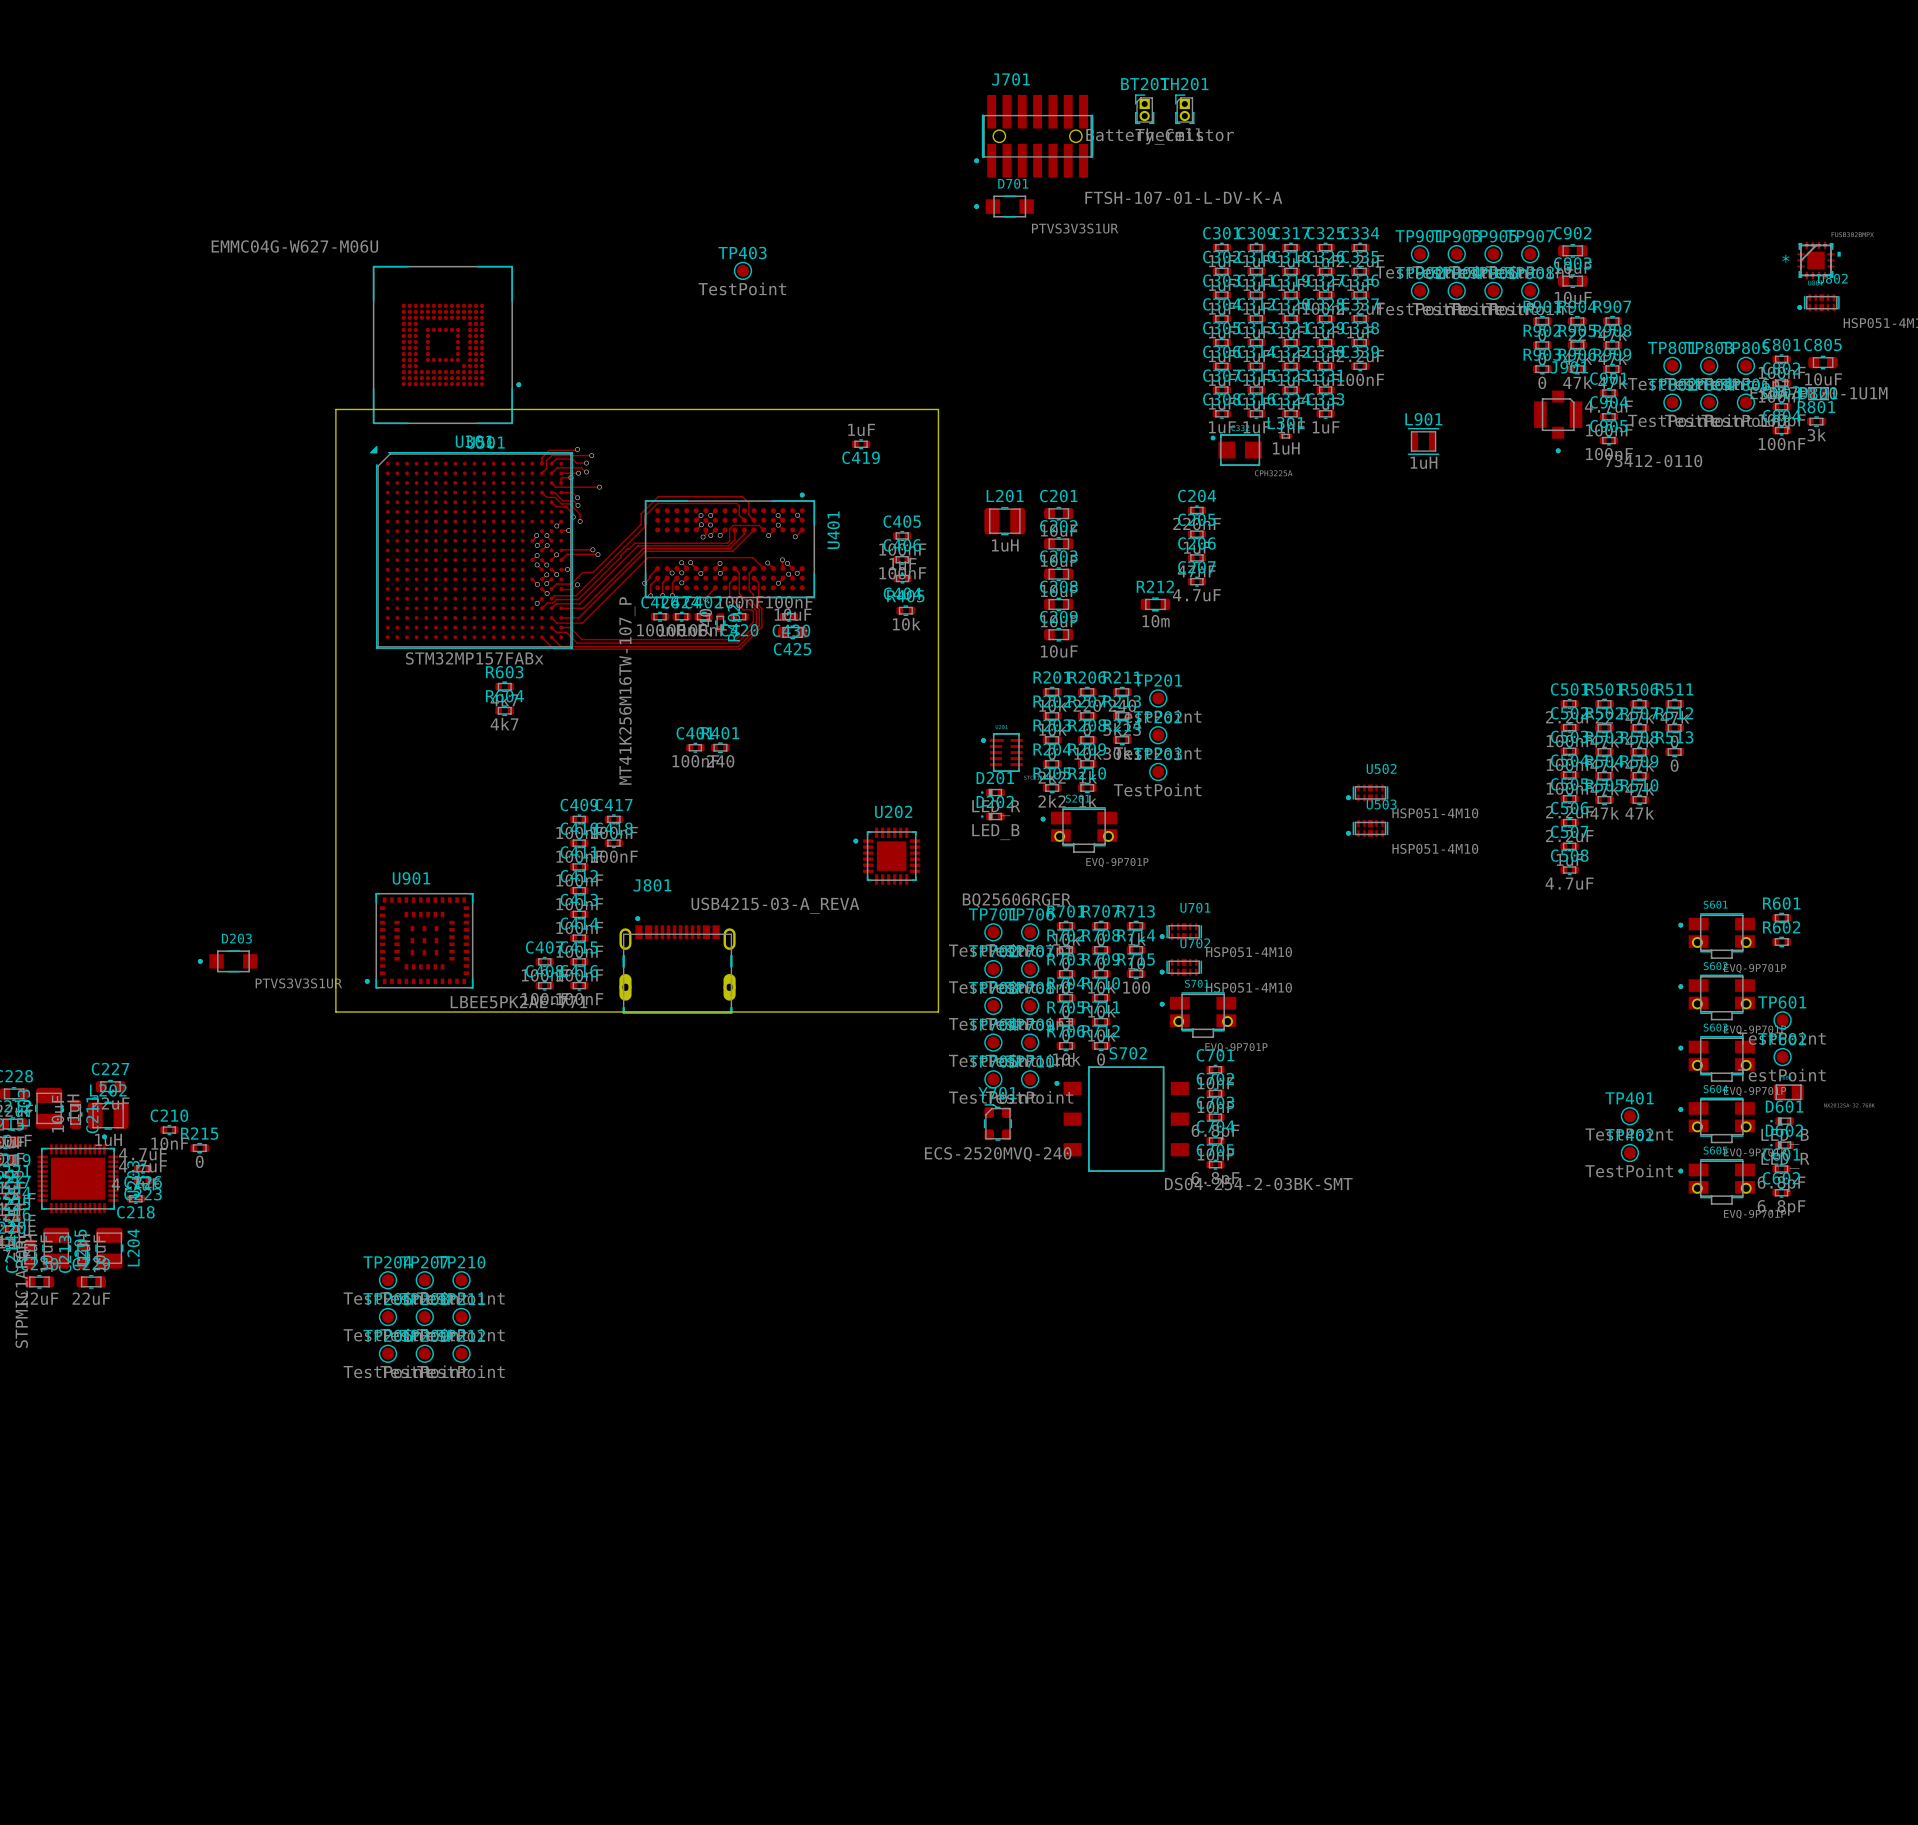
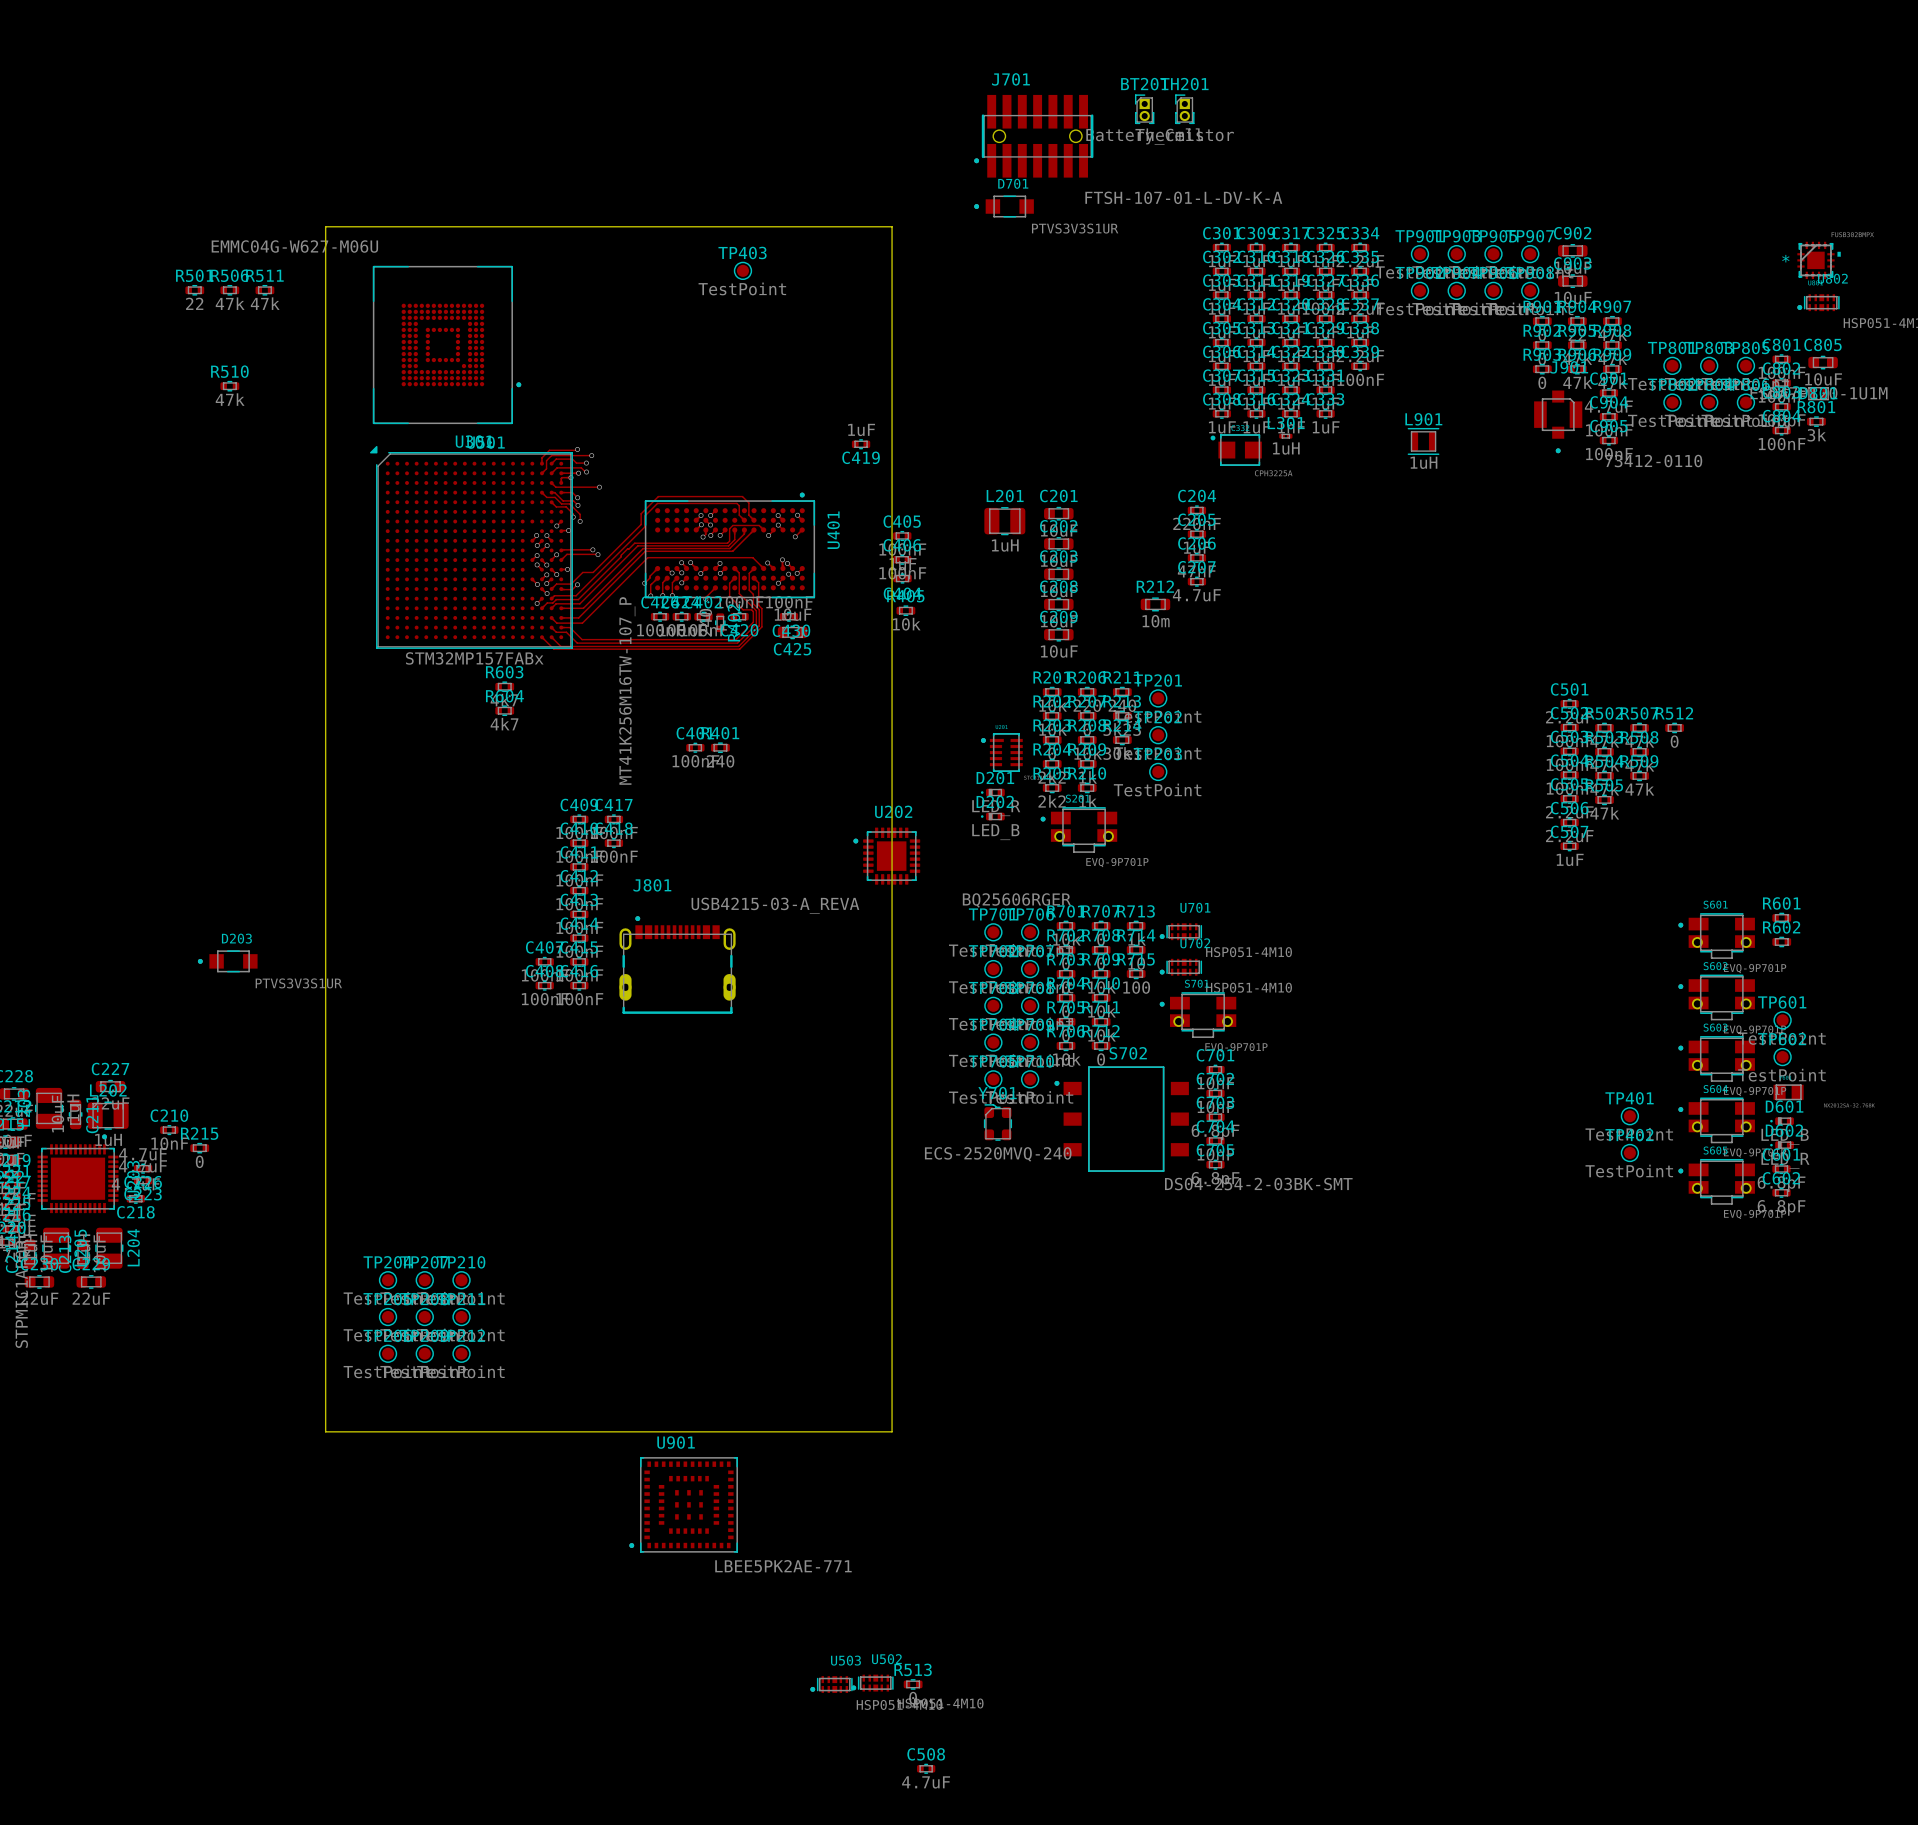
board edge: none -> (325, 226) (892, 226) (892, 1431) (325, 1431) (325, 226)
board edge: (335, 409) (938, 409) (938, 1011) (335, 1011) (335, 409) -> none
R501 position: (1604, 703) -> (194, 290)
R506 position: (1639, 703) -> (229, 290)
R511 position: (1674, 703) -> (264, 290)
R513 position: (1674, 751) -> (913, 1684)
U502 position: (1367, 792) -> (872, 1683)
R510 position: (1639, 799) -> (229, 386)
U503 position: (1367, 828) -> (831, 1684)
C508 position: (1569, 870) -> (926, 1768)
U901 position: (419, 940) -> (683, 1504)

